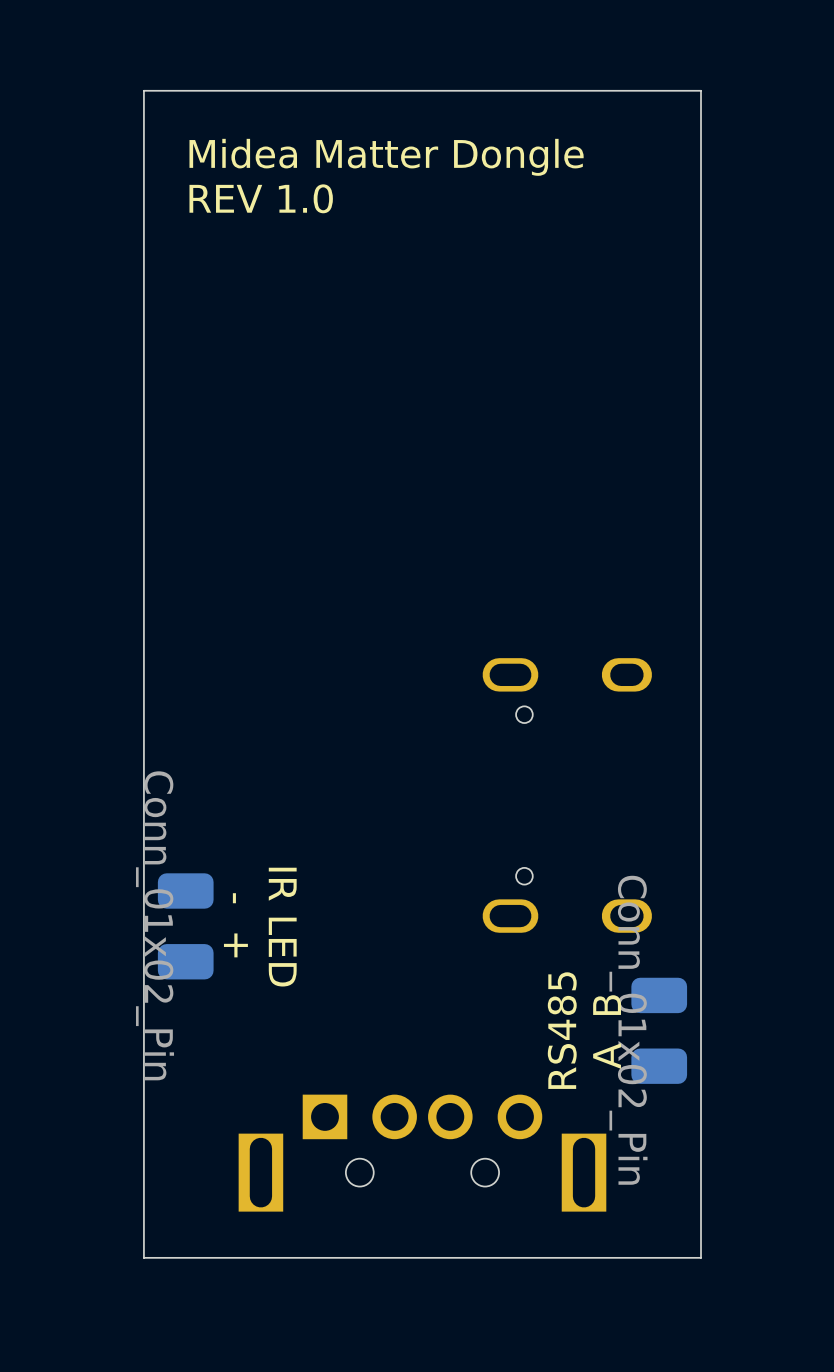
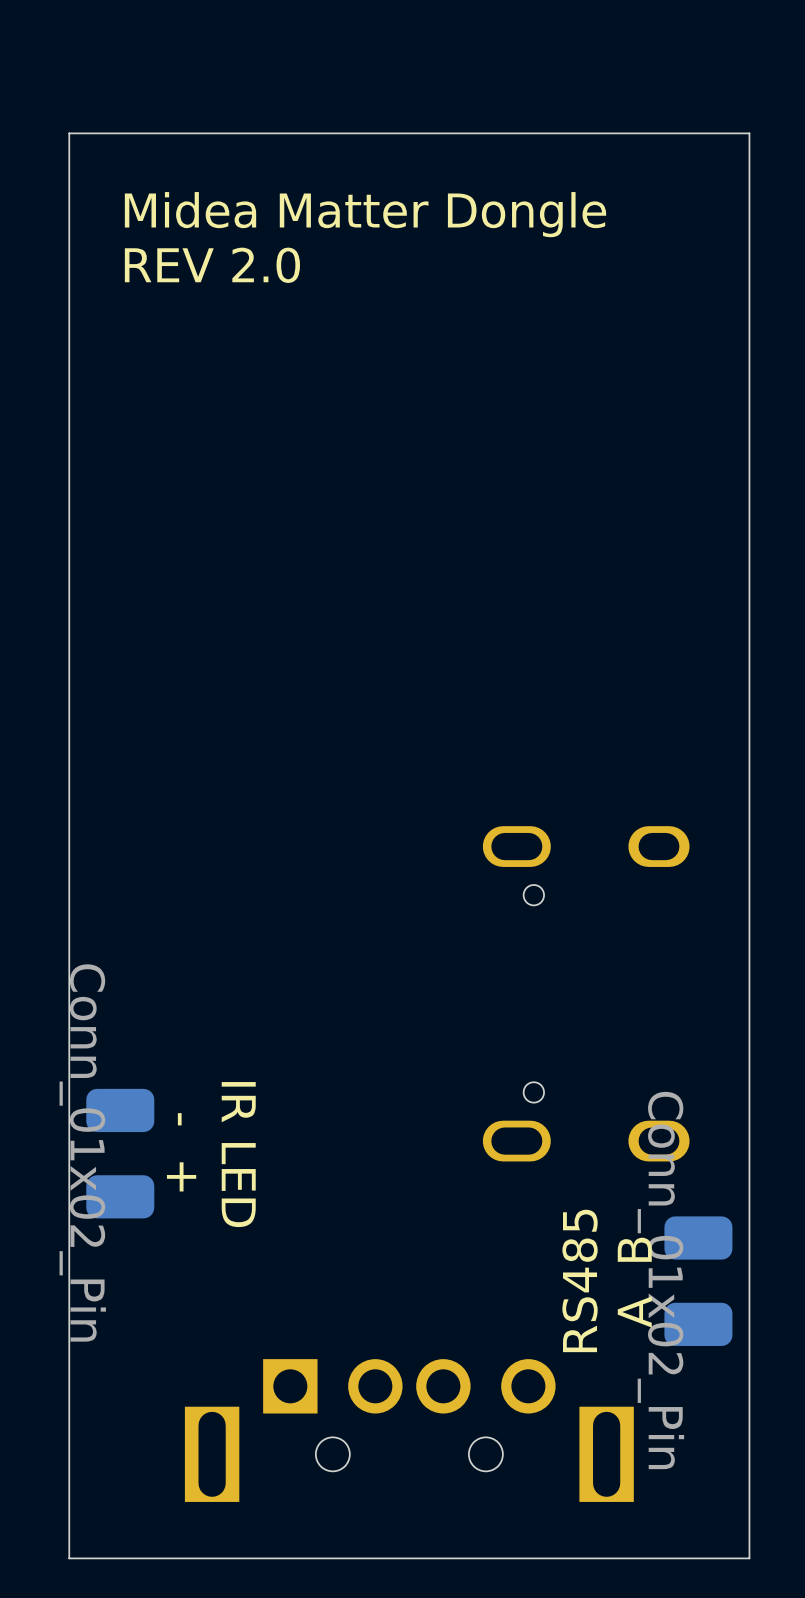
text: REV 1.0 (261, 198) -> REV 2.0 (212, 265)

